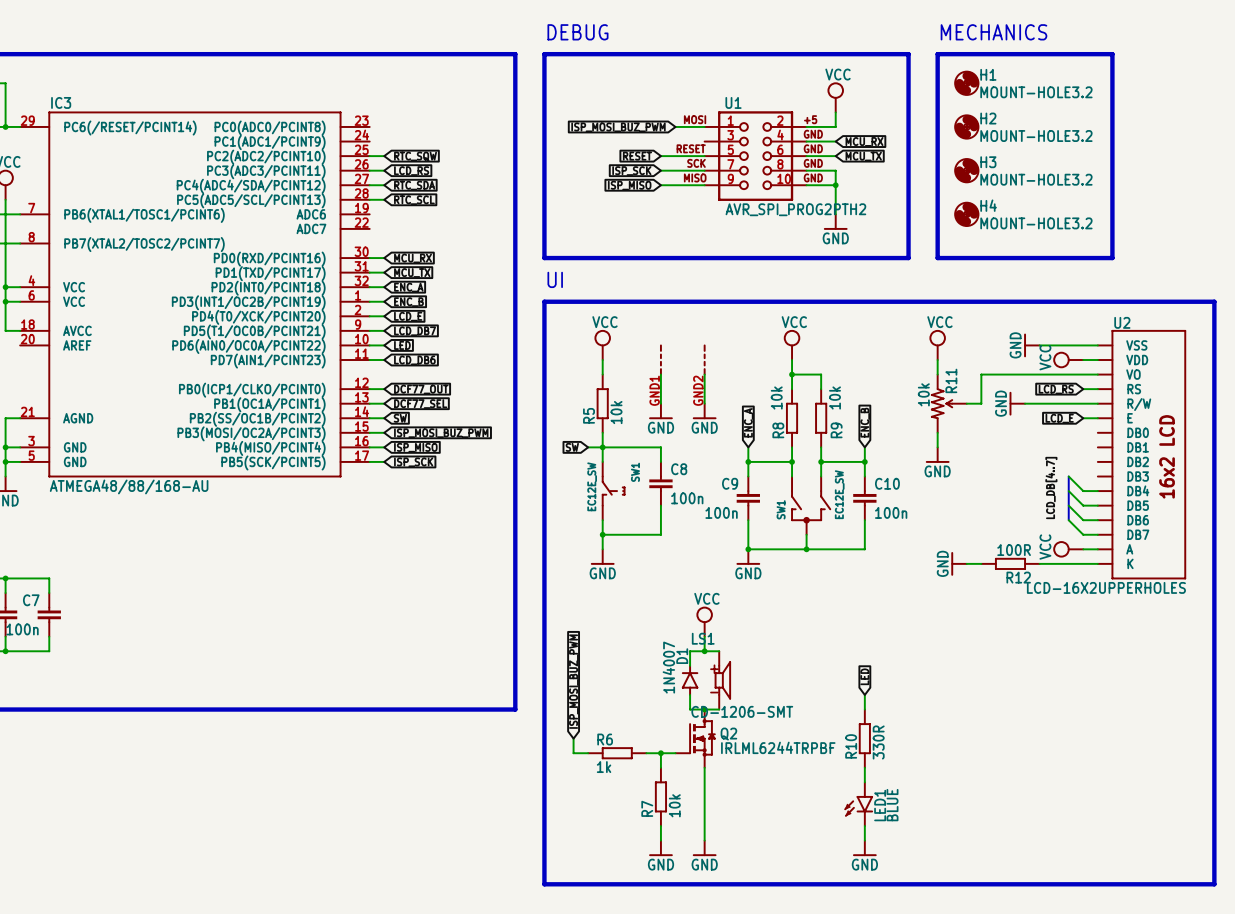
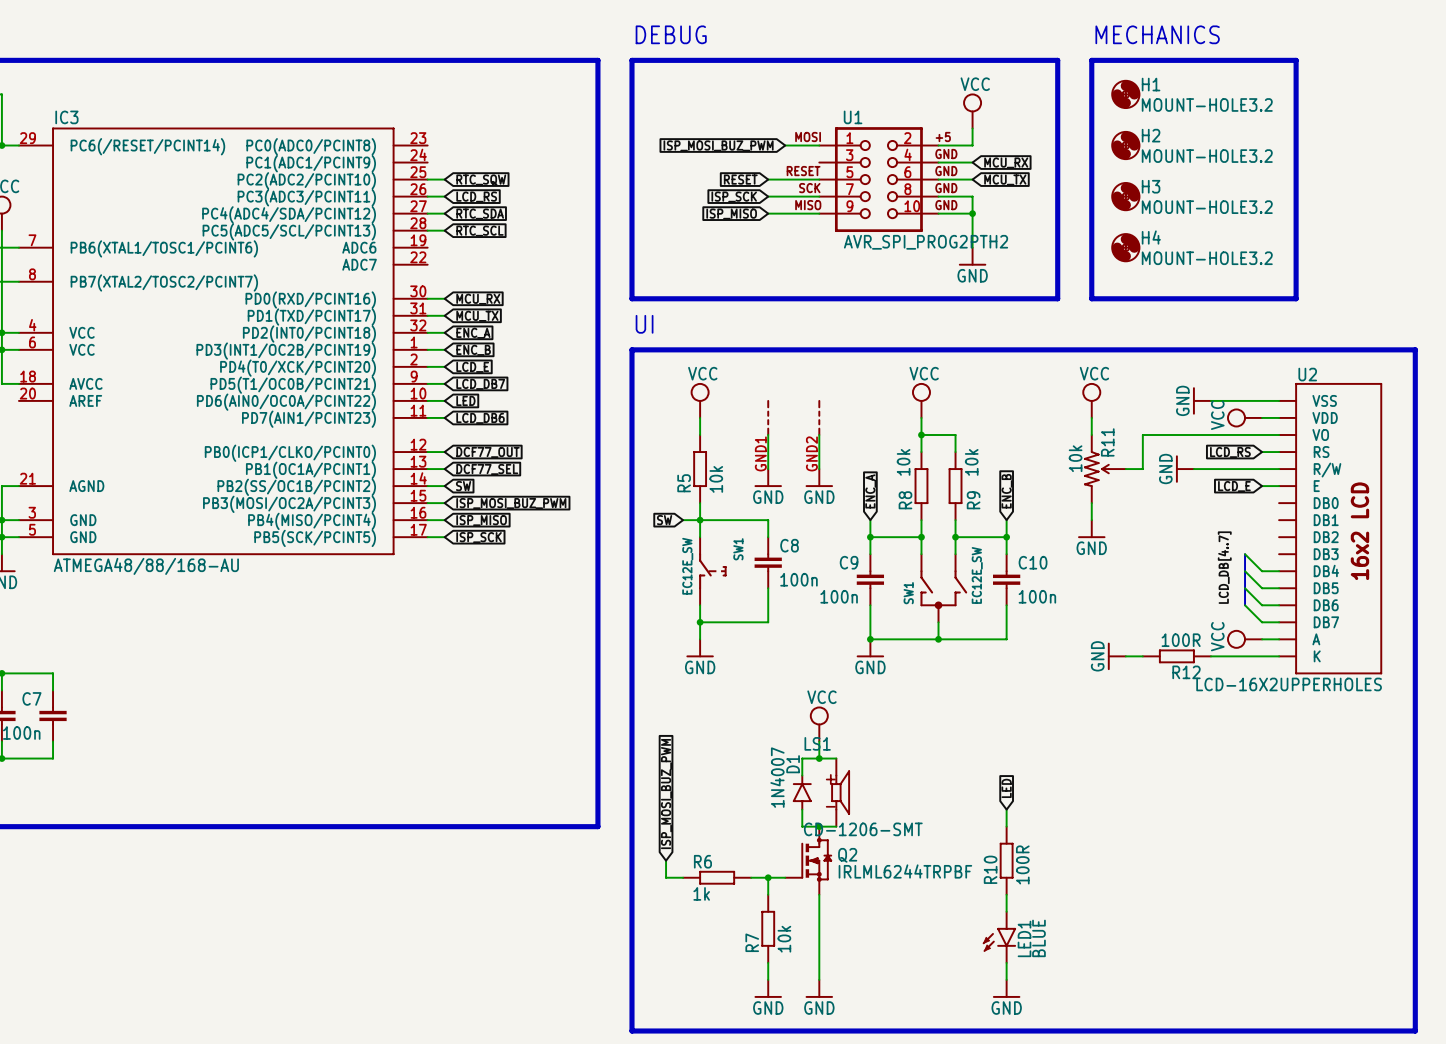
R10 value: 330R (878, 742) -> 100R (1022, 864)

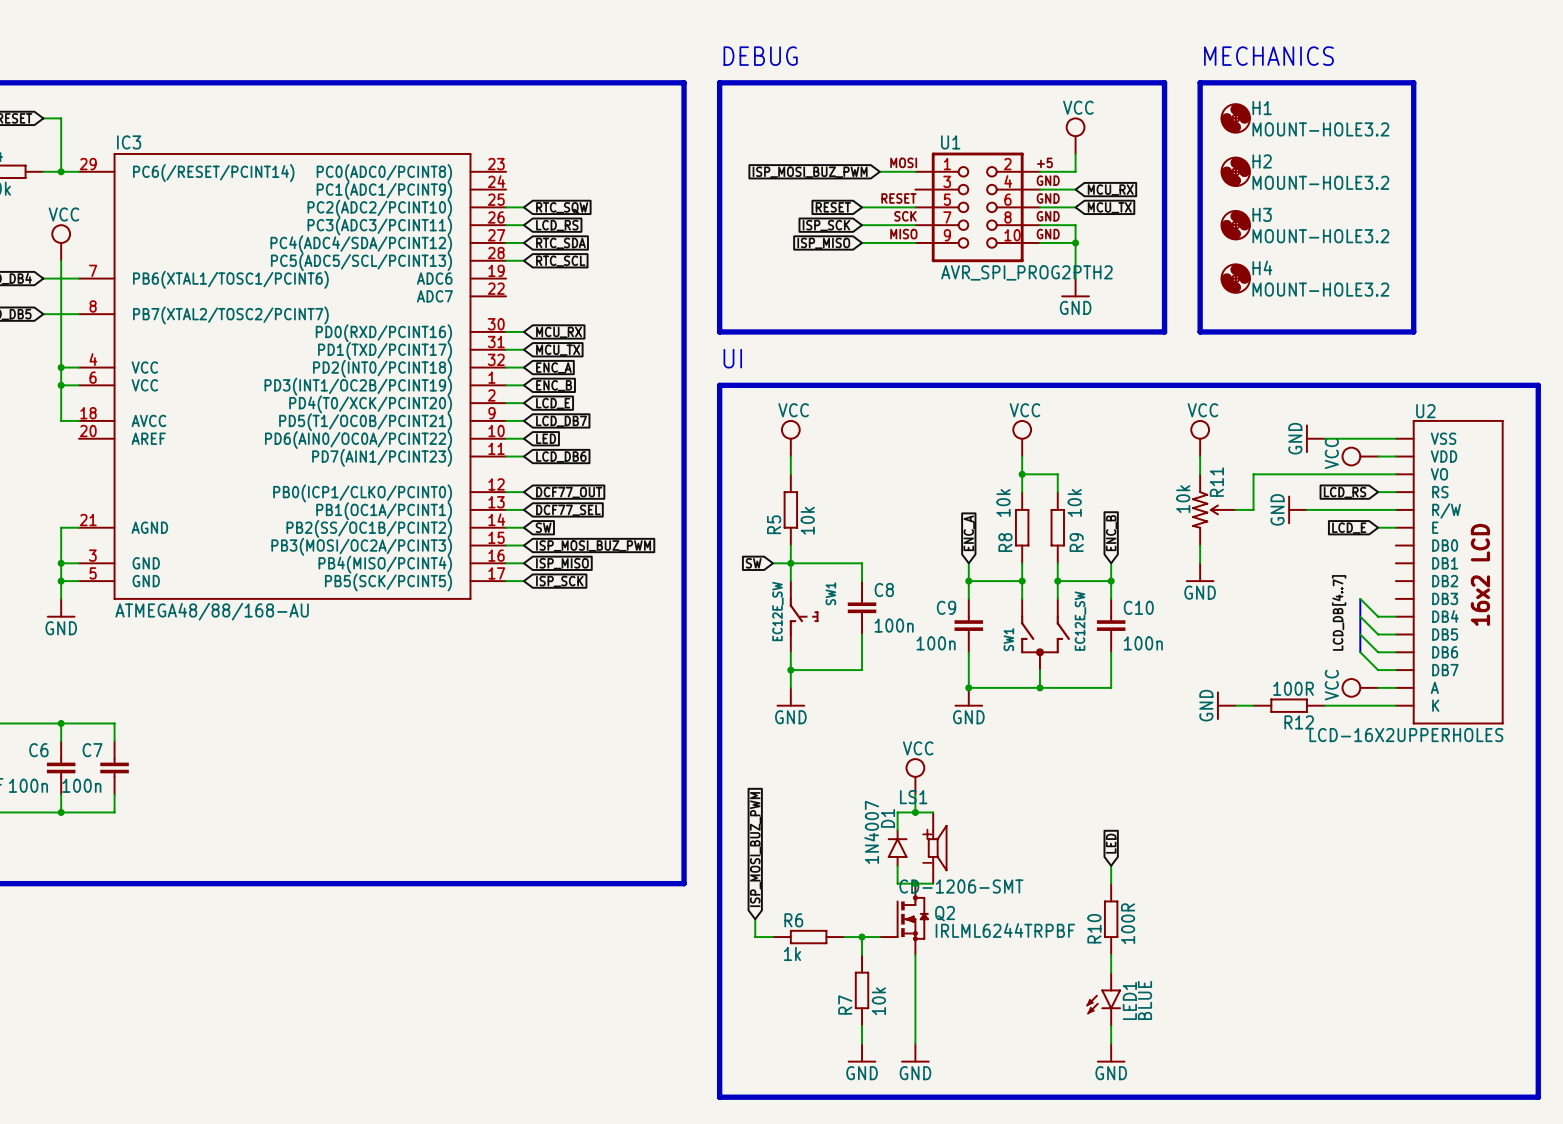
part: (768, 417) -> none
part: (819, 417) -> none
wire: (768, 435) (768, 469) -> none
wire: (819, 435) (819, 469) -> none
power symbol: GND (768, 477) -> none
power symbol: GND (819, 477) -> none

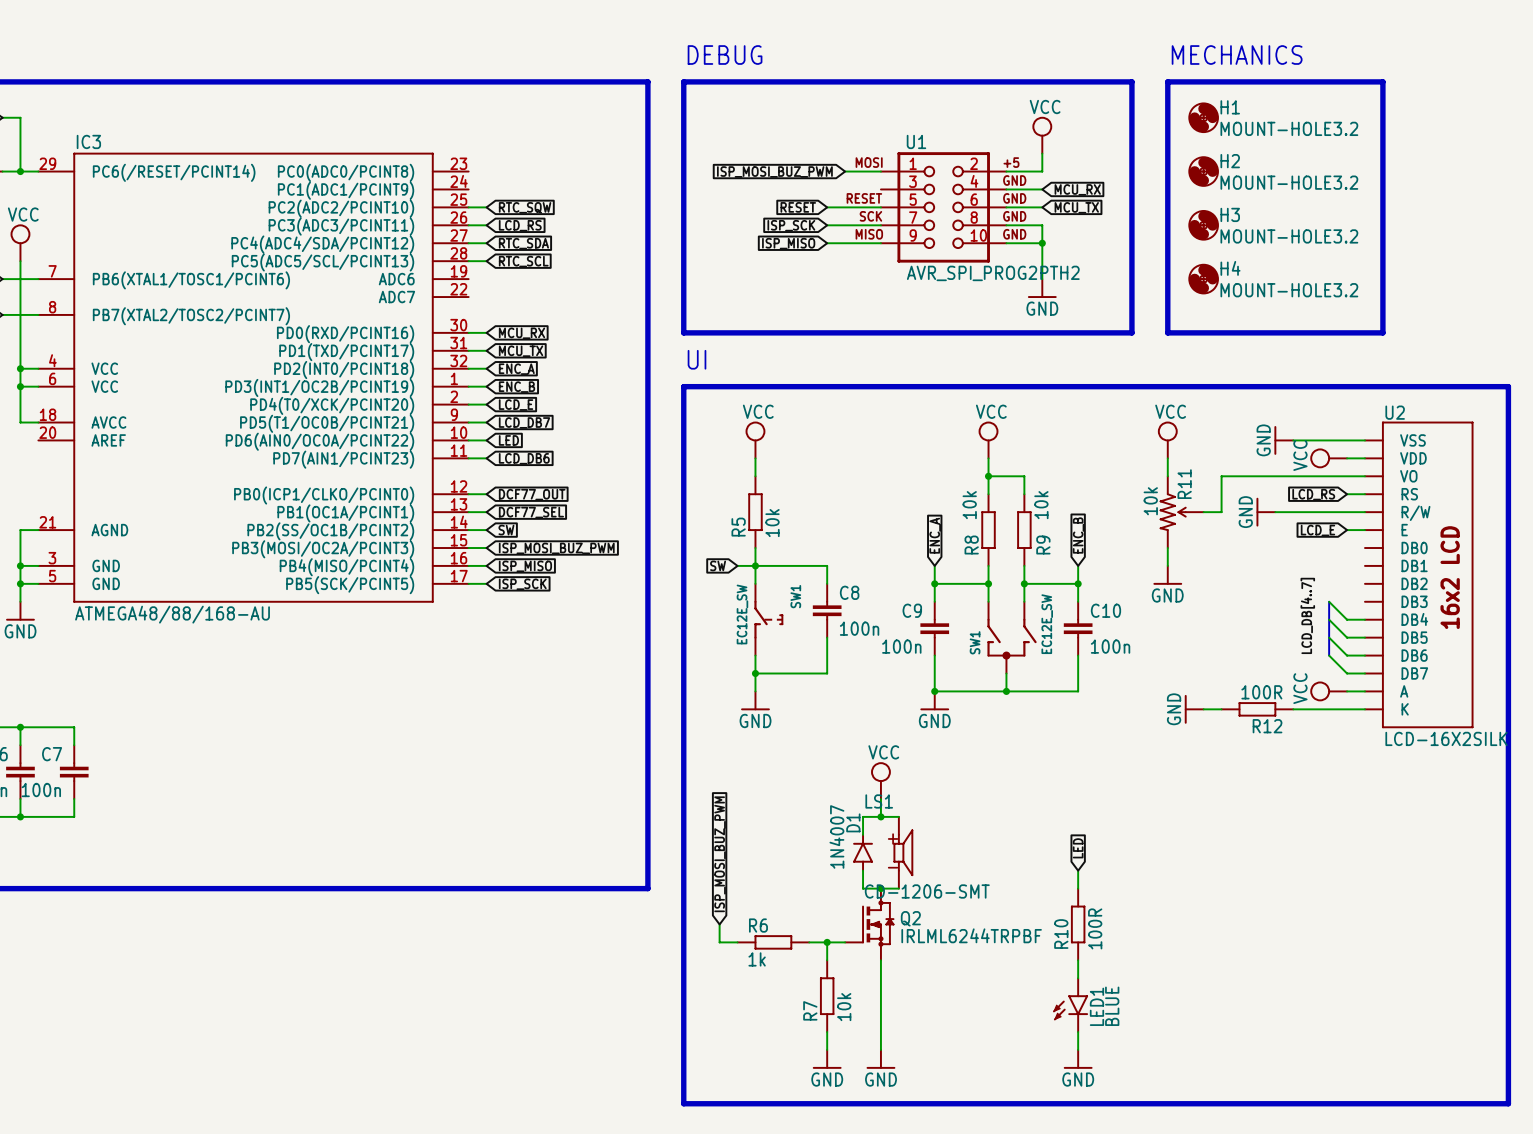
U2 value: LCD-16X2UPPERHOLES (1406, 735) -> LCD-16X2SILK (1446, 738)

